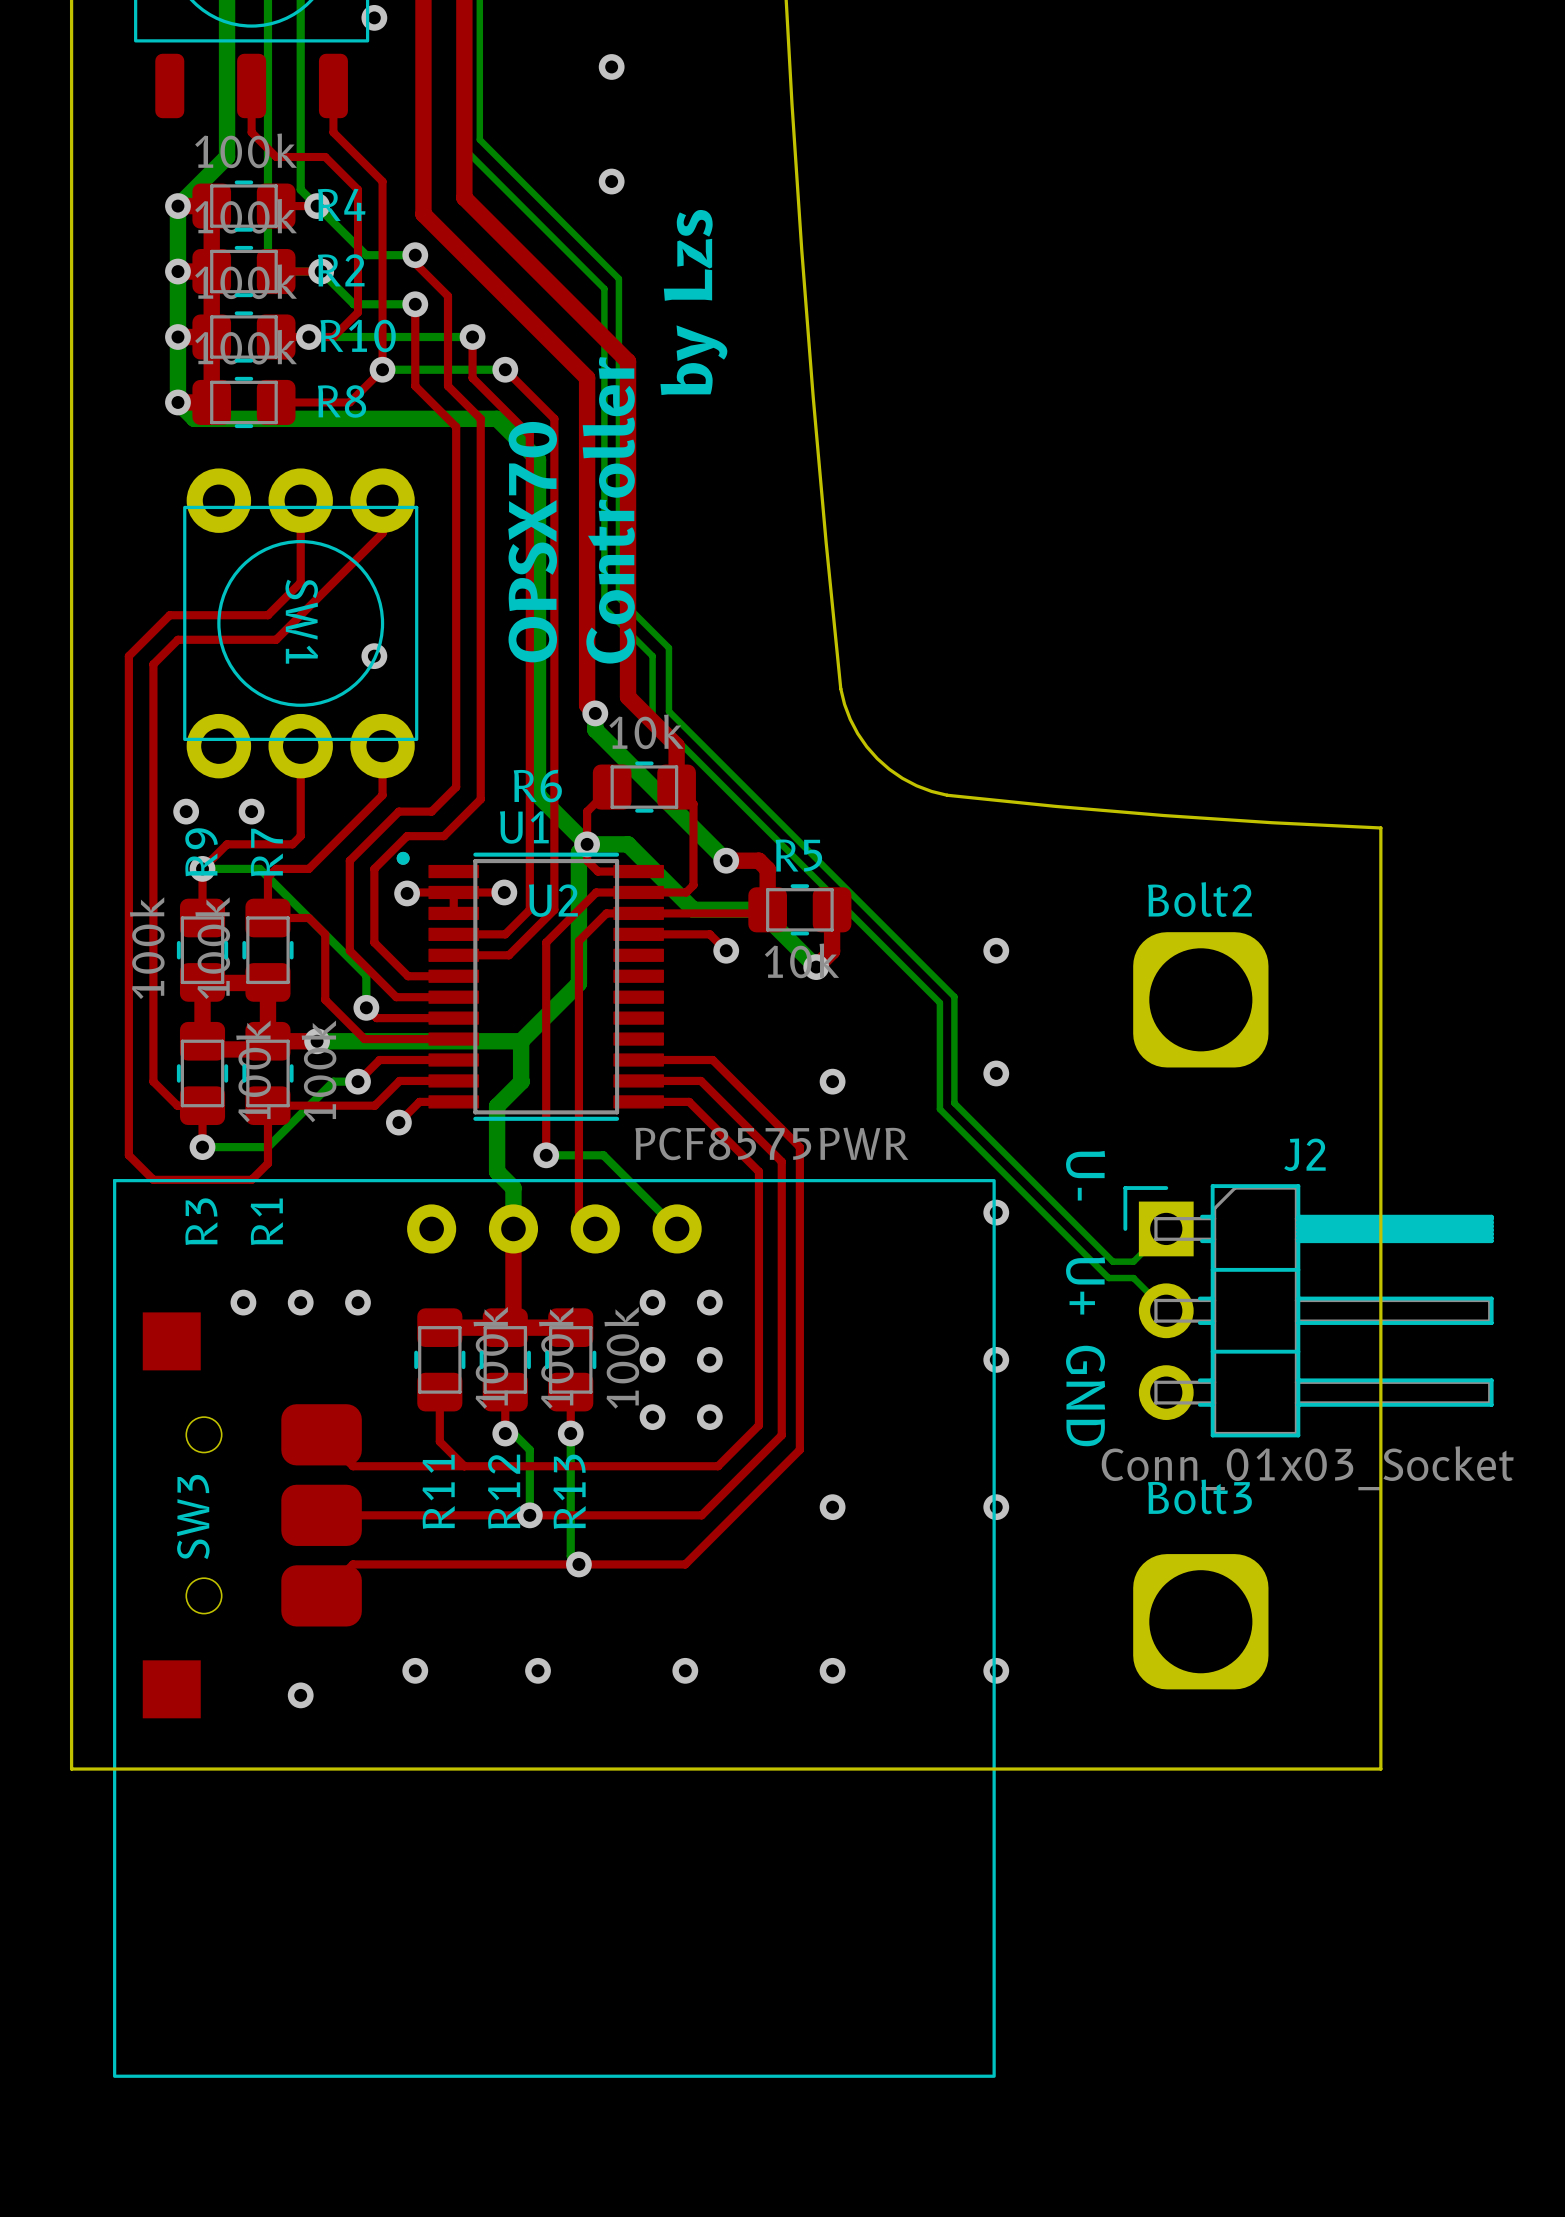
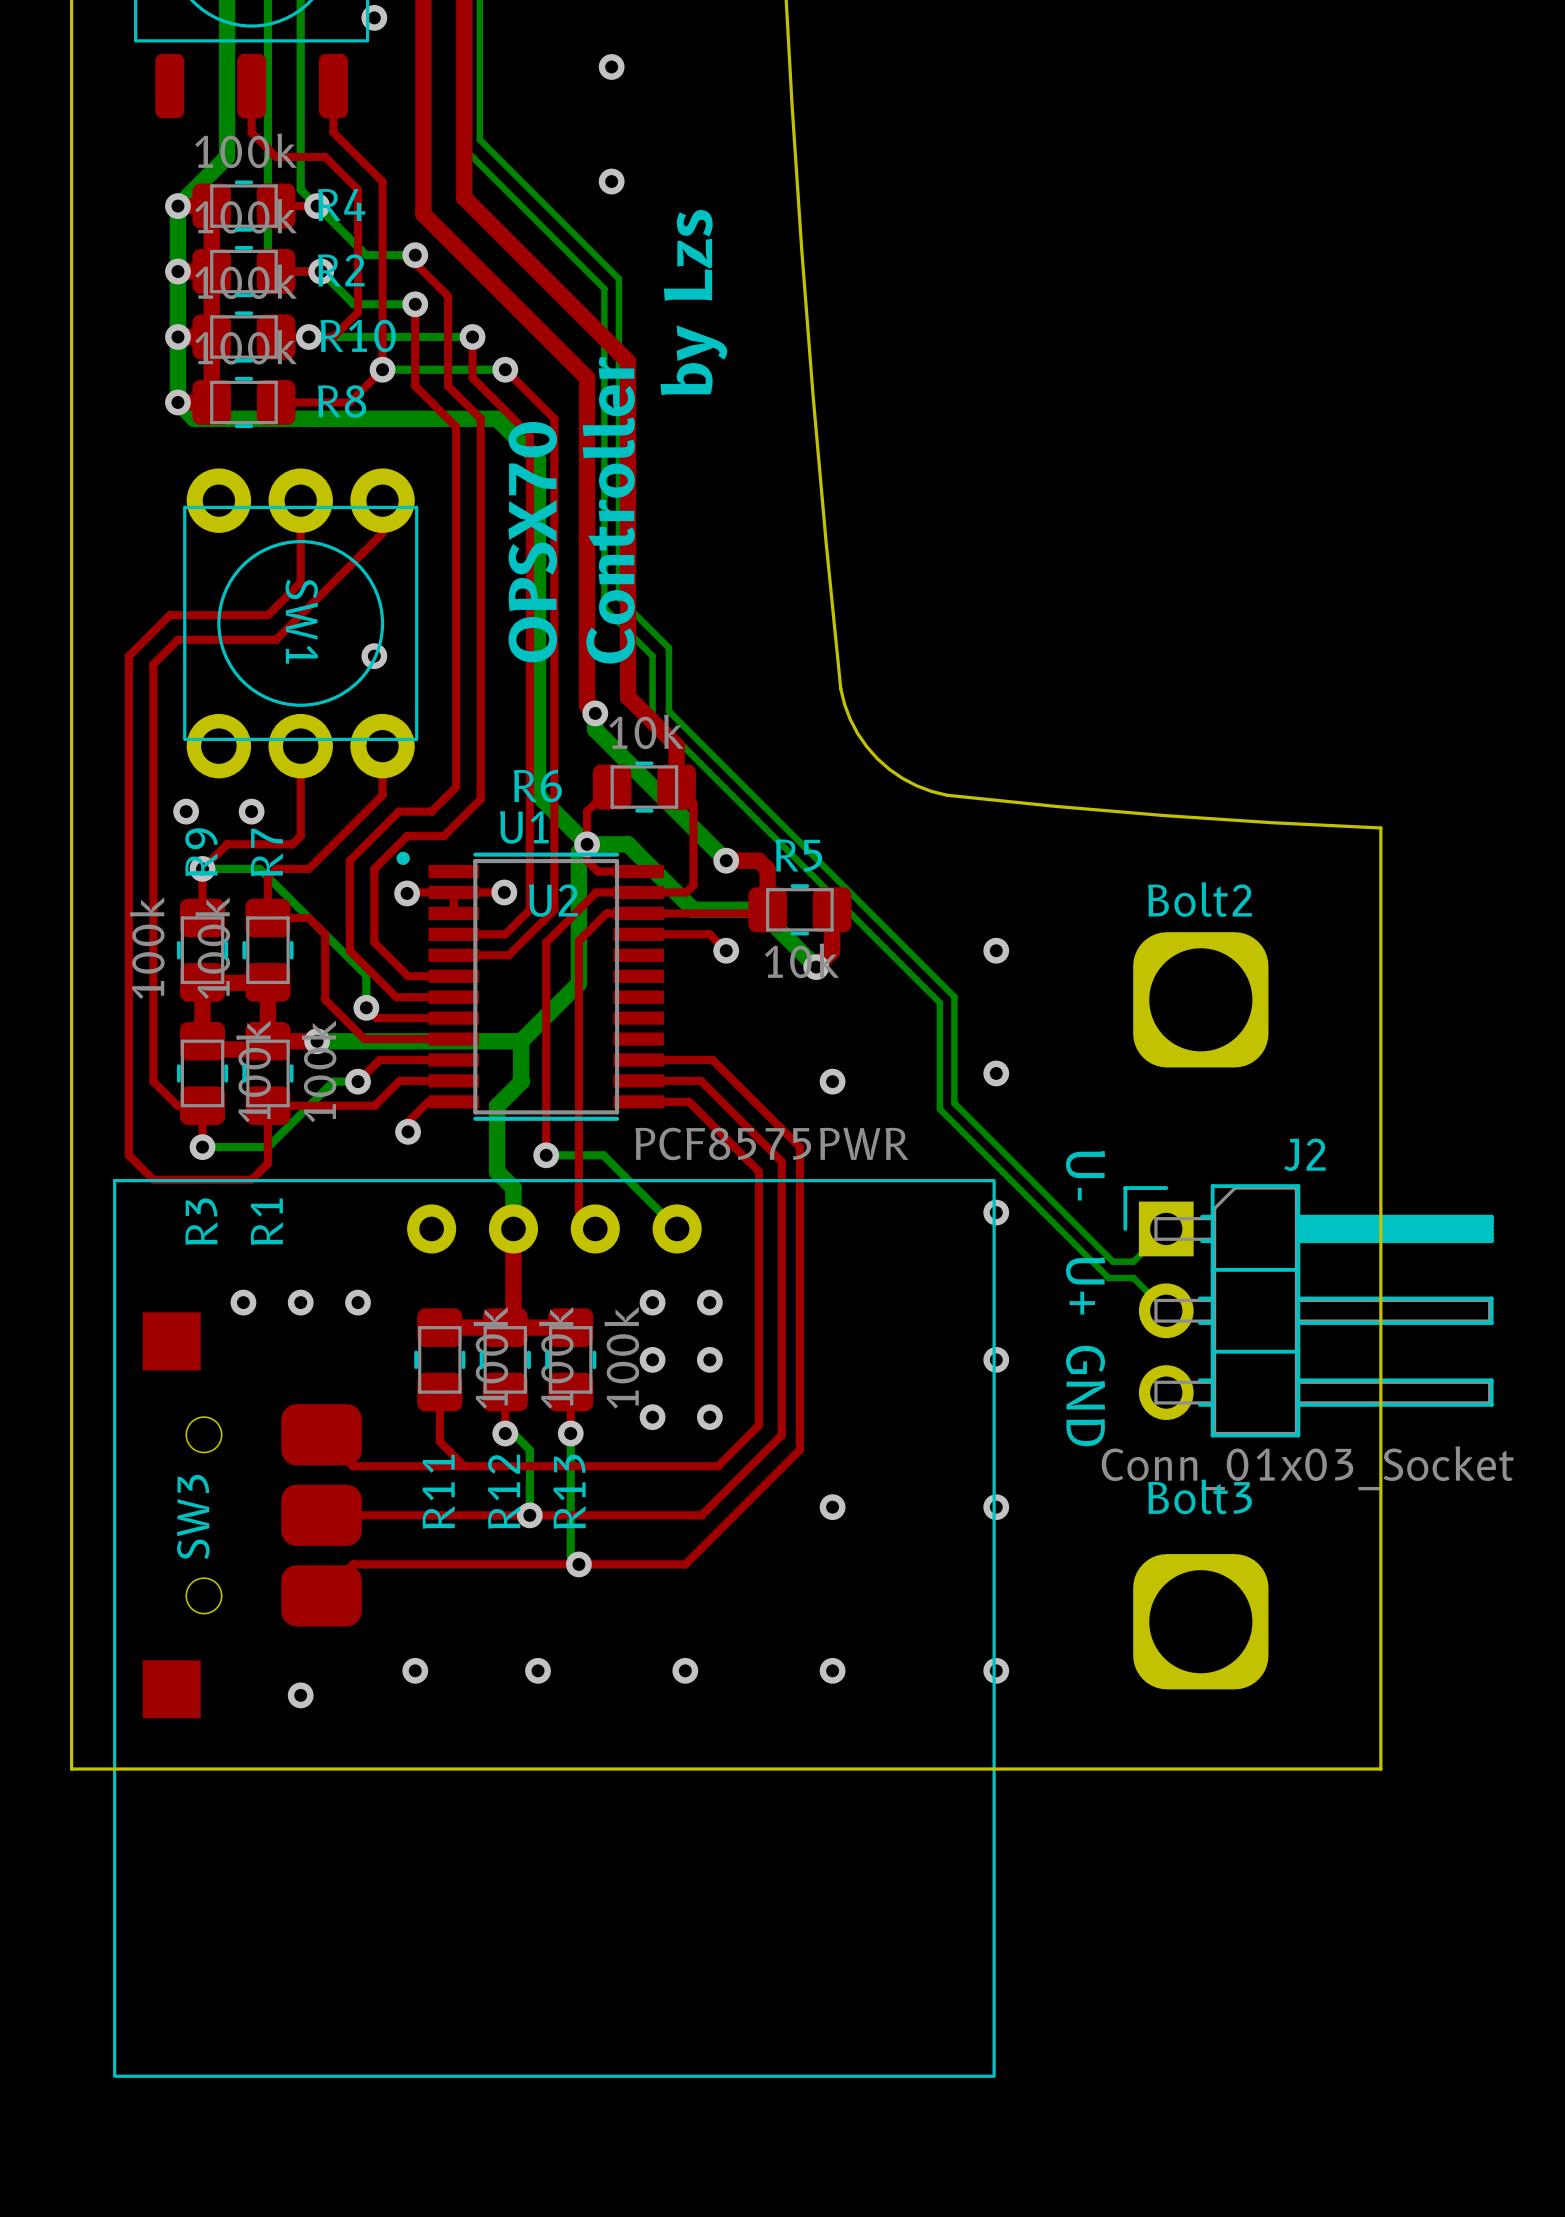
top track: (428, 1101) (419, 1101) (398, 1122) -> (428, 1101) (408, 1122) (408, 1131)
via position: (398, 1122) -> (408, 1131)

